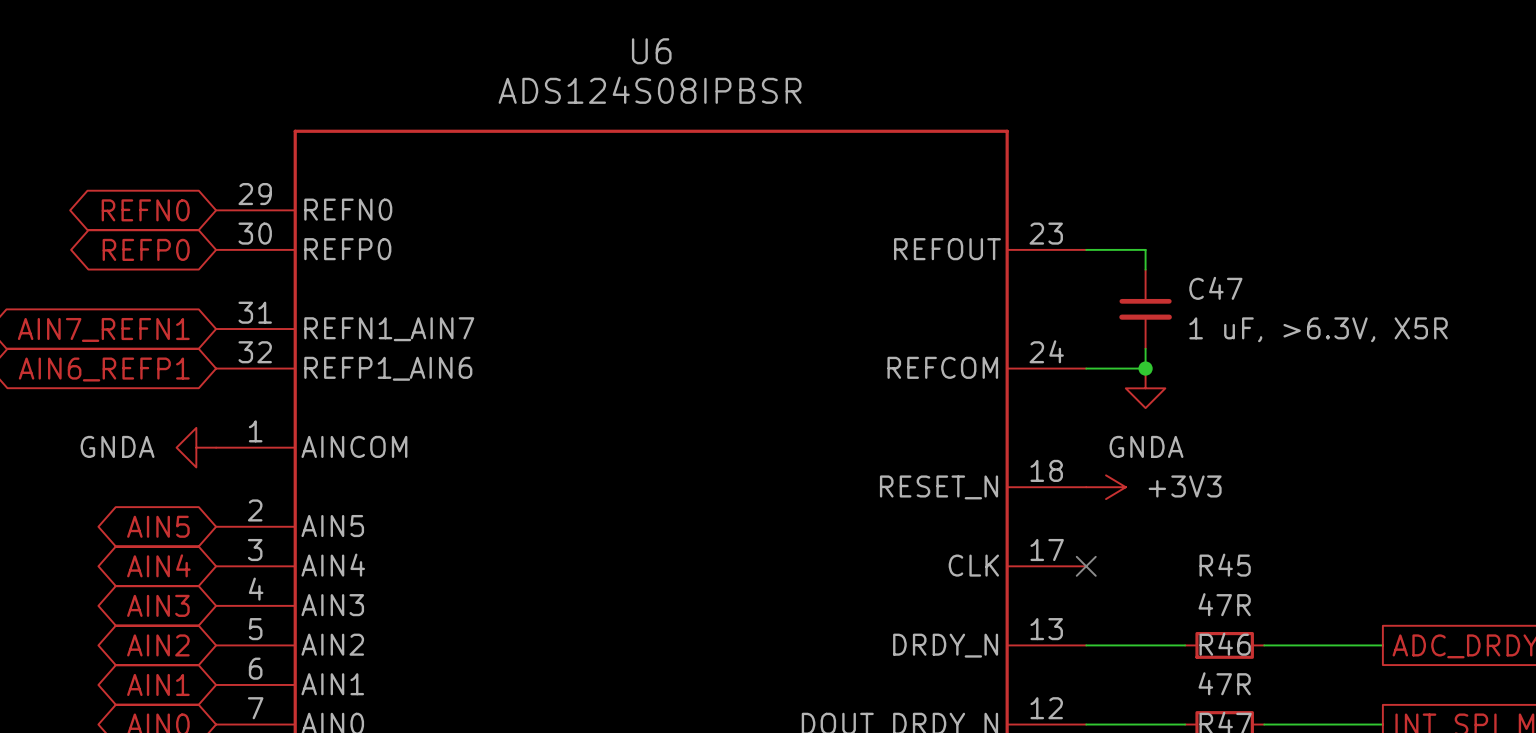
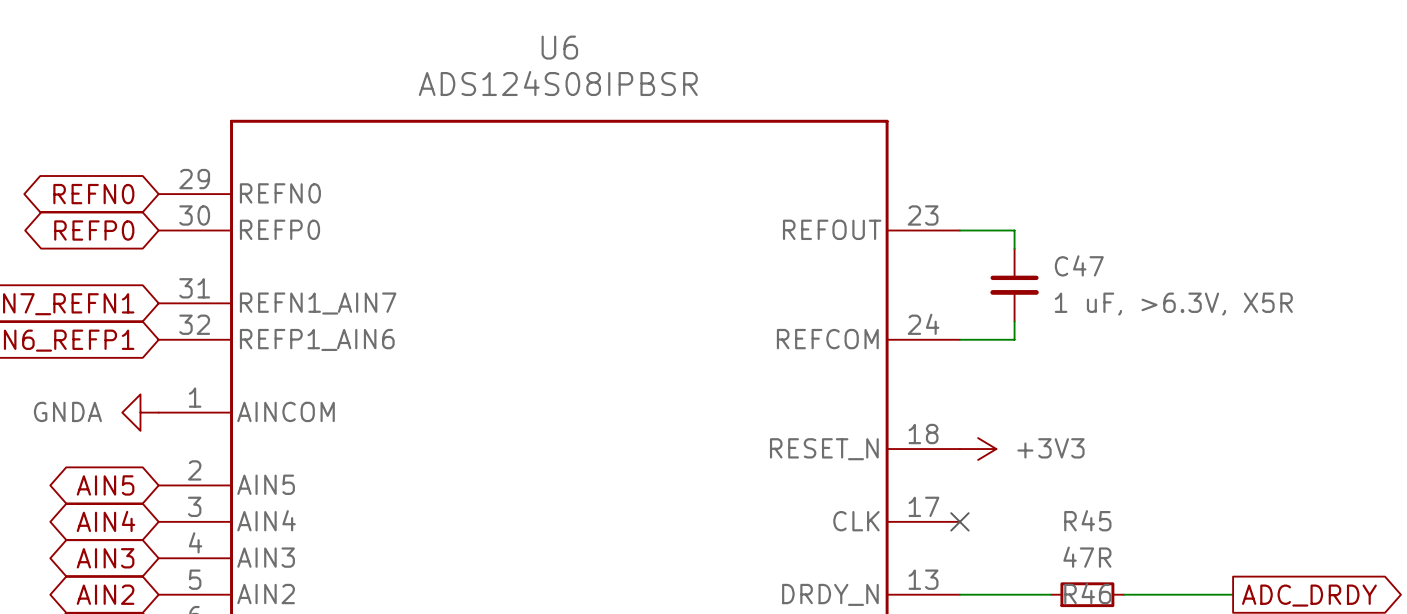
junction: (1145, 368) -> none
power symbol: GNDA (1145, 388) -> none

